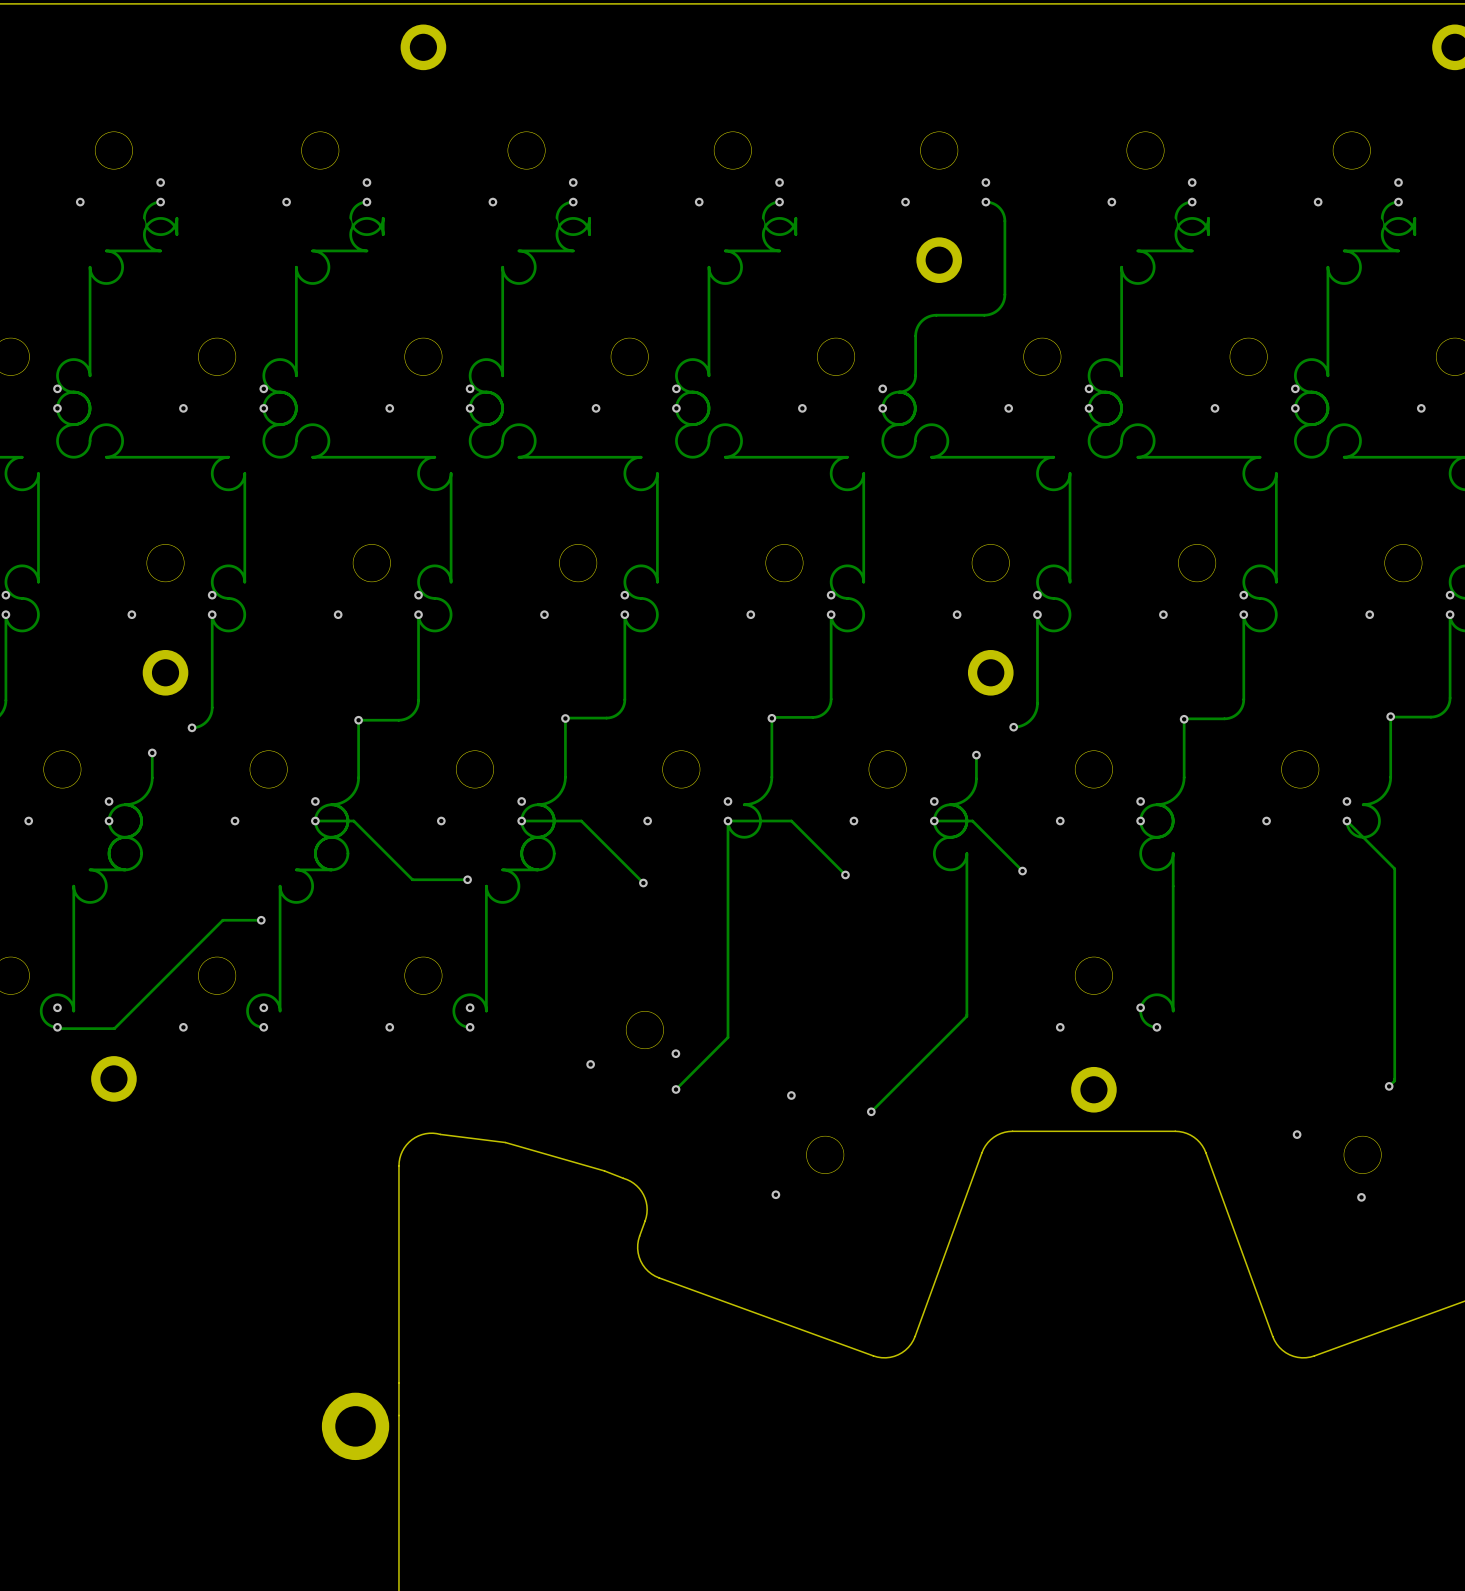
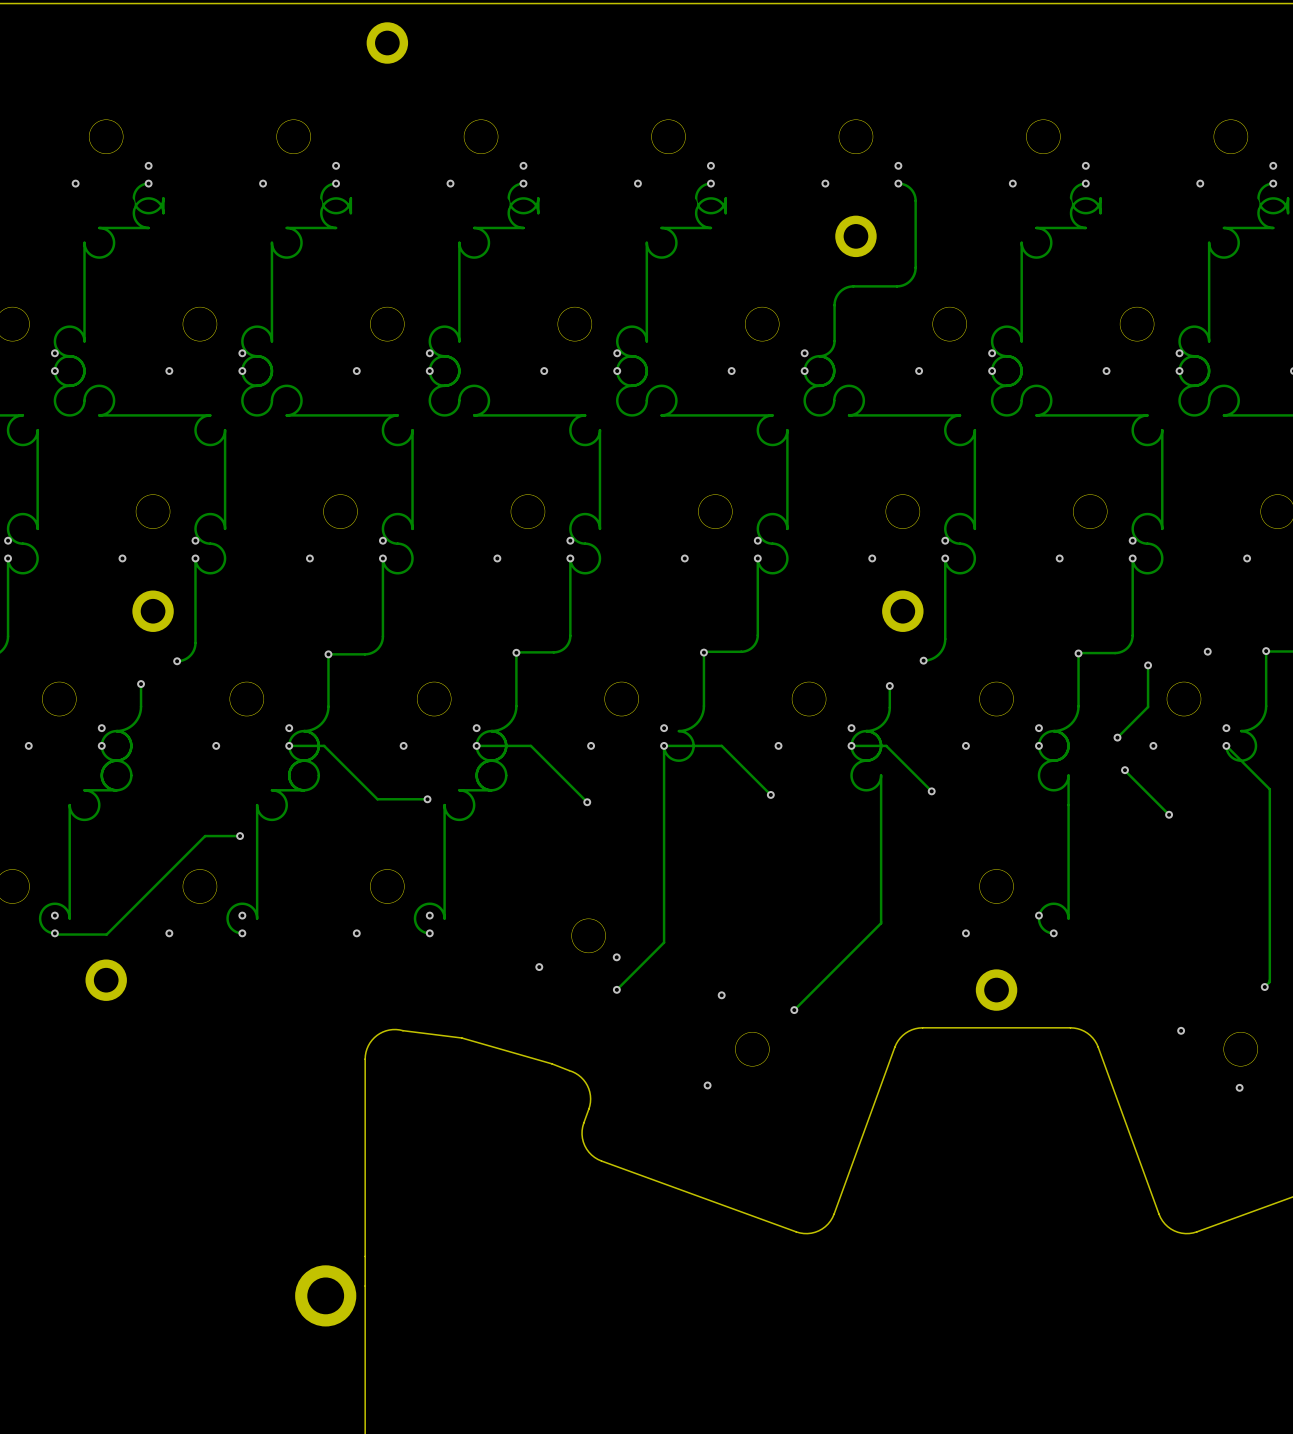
via: none -> (1207, 651)
track: none -> (1148, 665) (1148, 707) (1117, 737)
via: none -> (1148, 665)
via: none -> (1117, 737)
track: none -> (1124, 770) (1169, 814)
via: none -> (1124, 770)
via: none -> (1169, 814)

